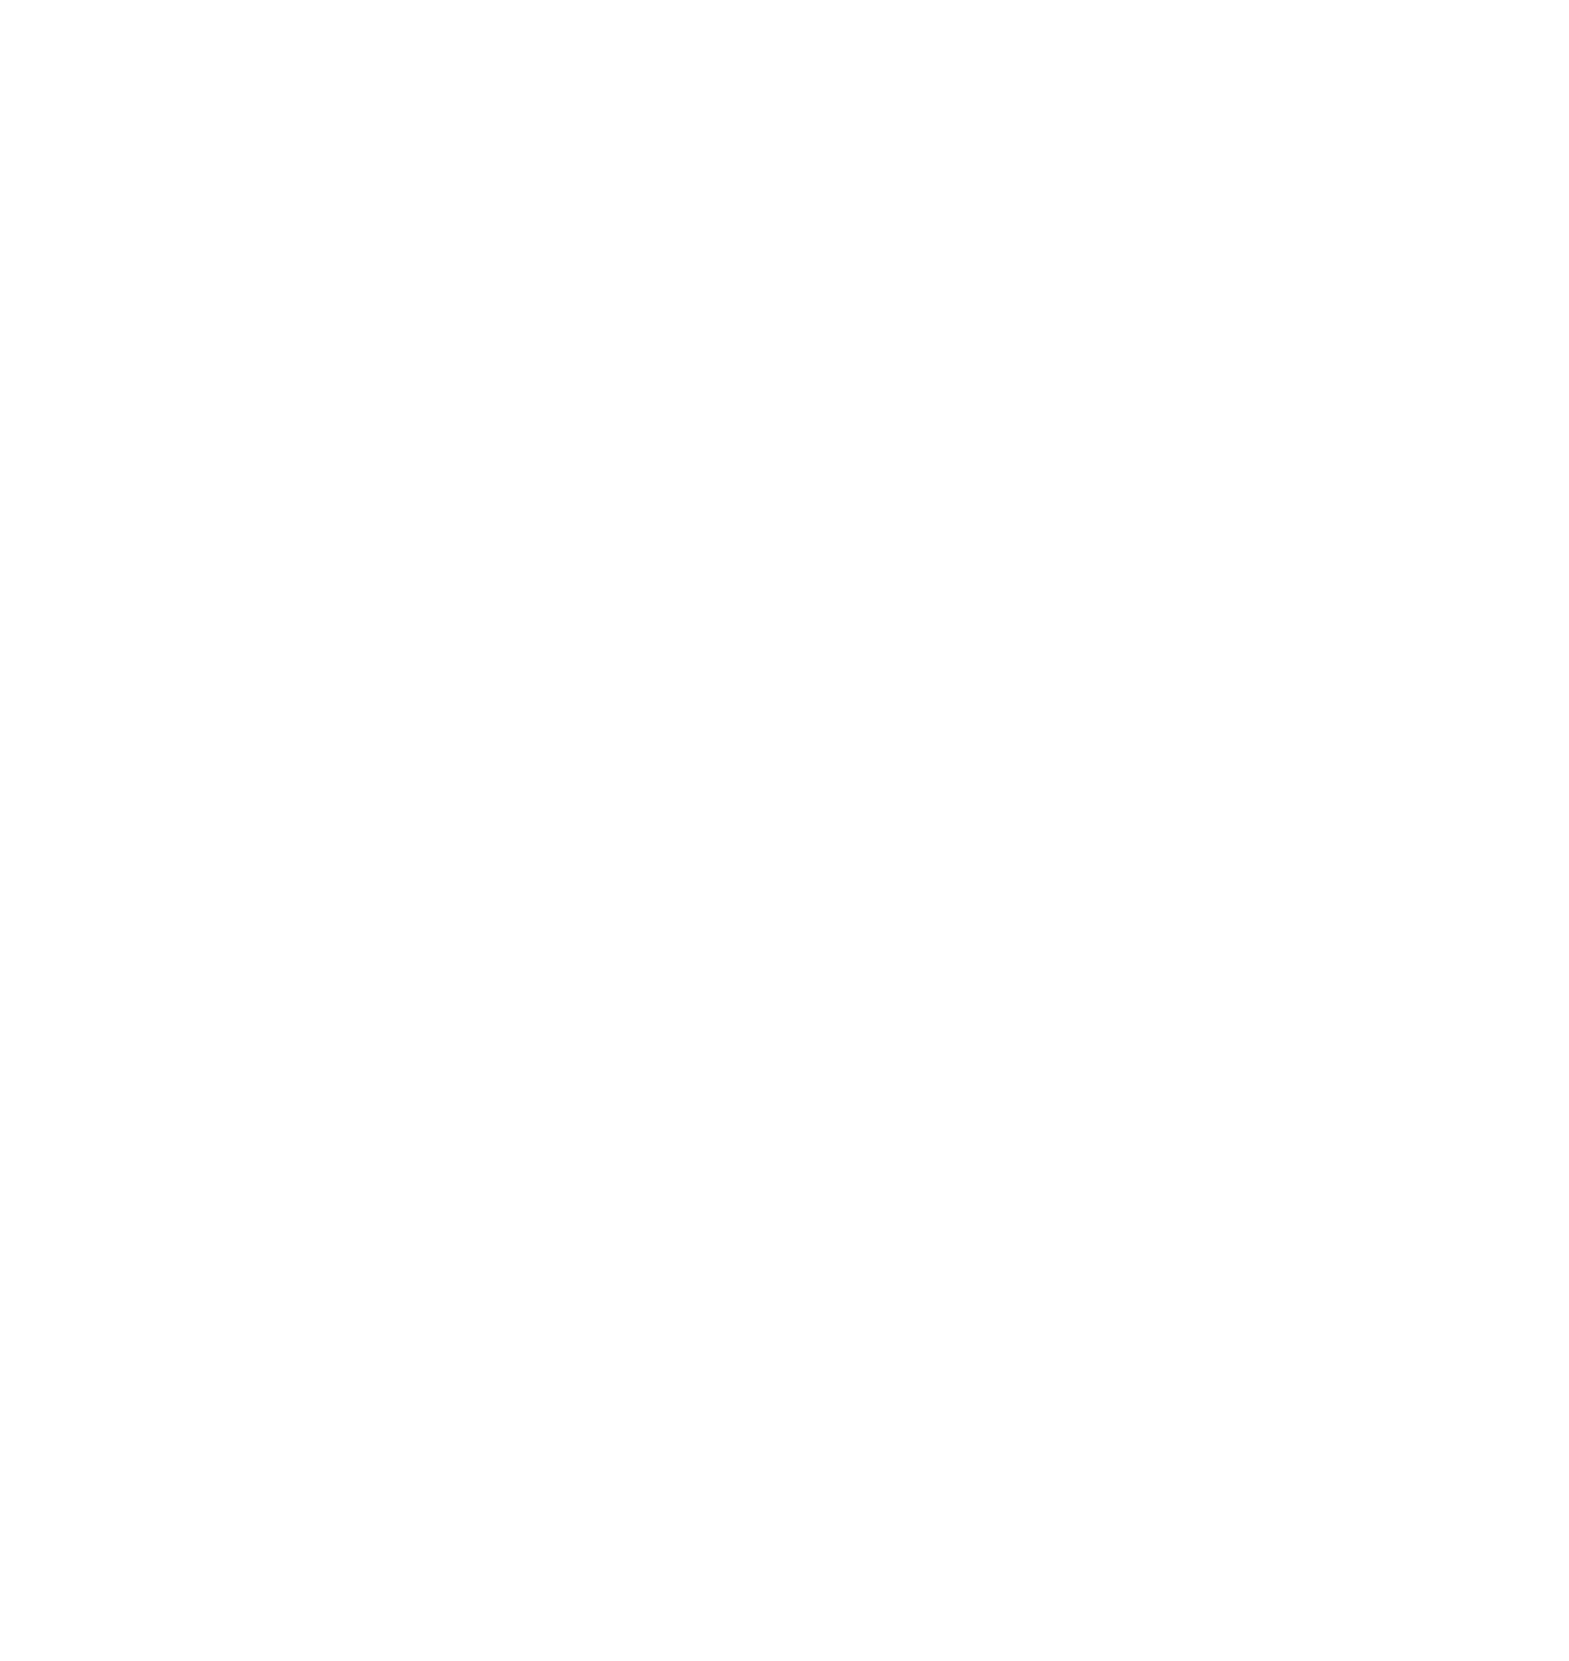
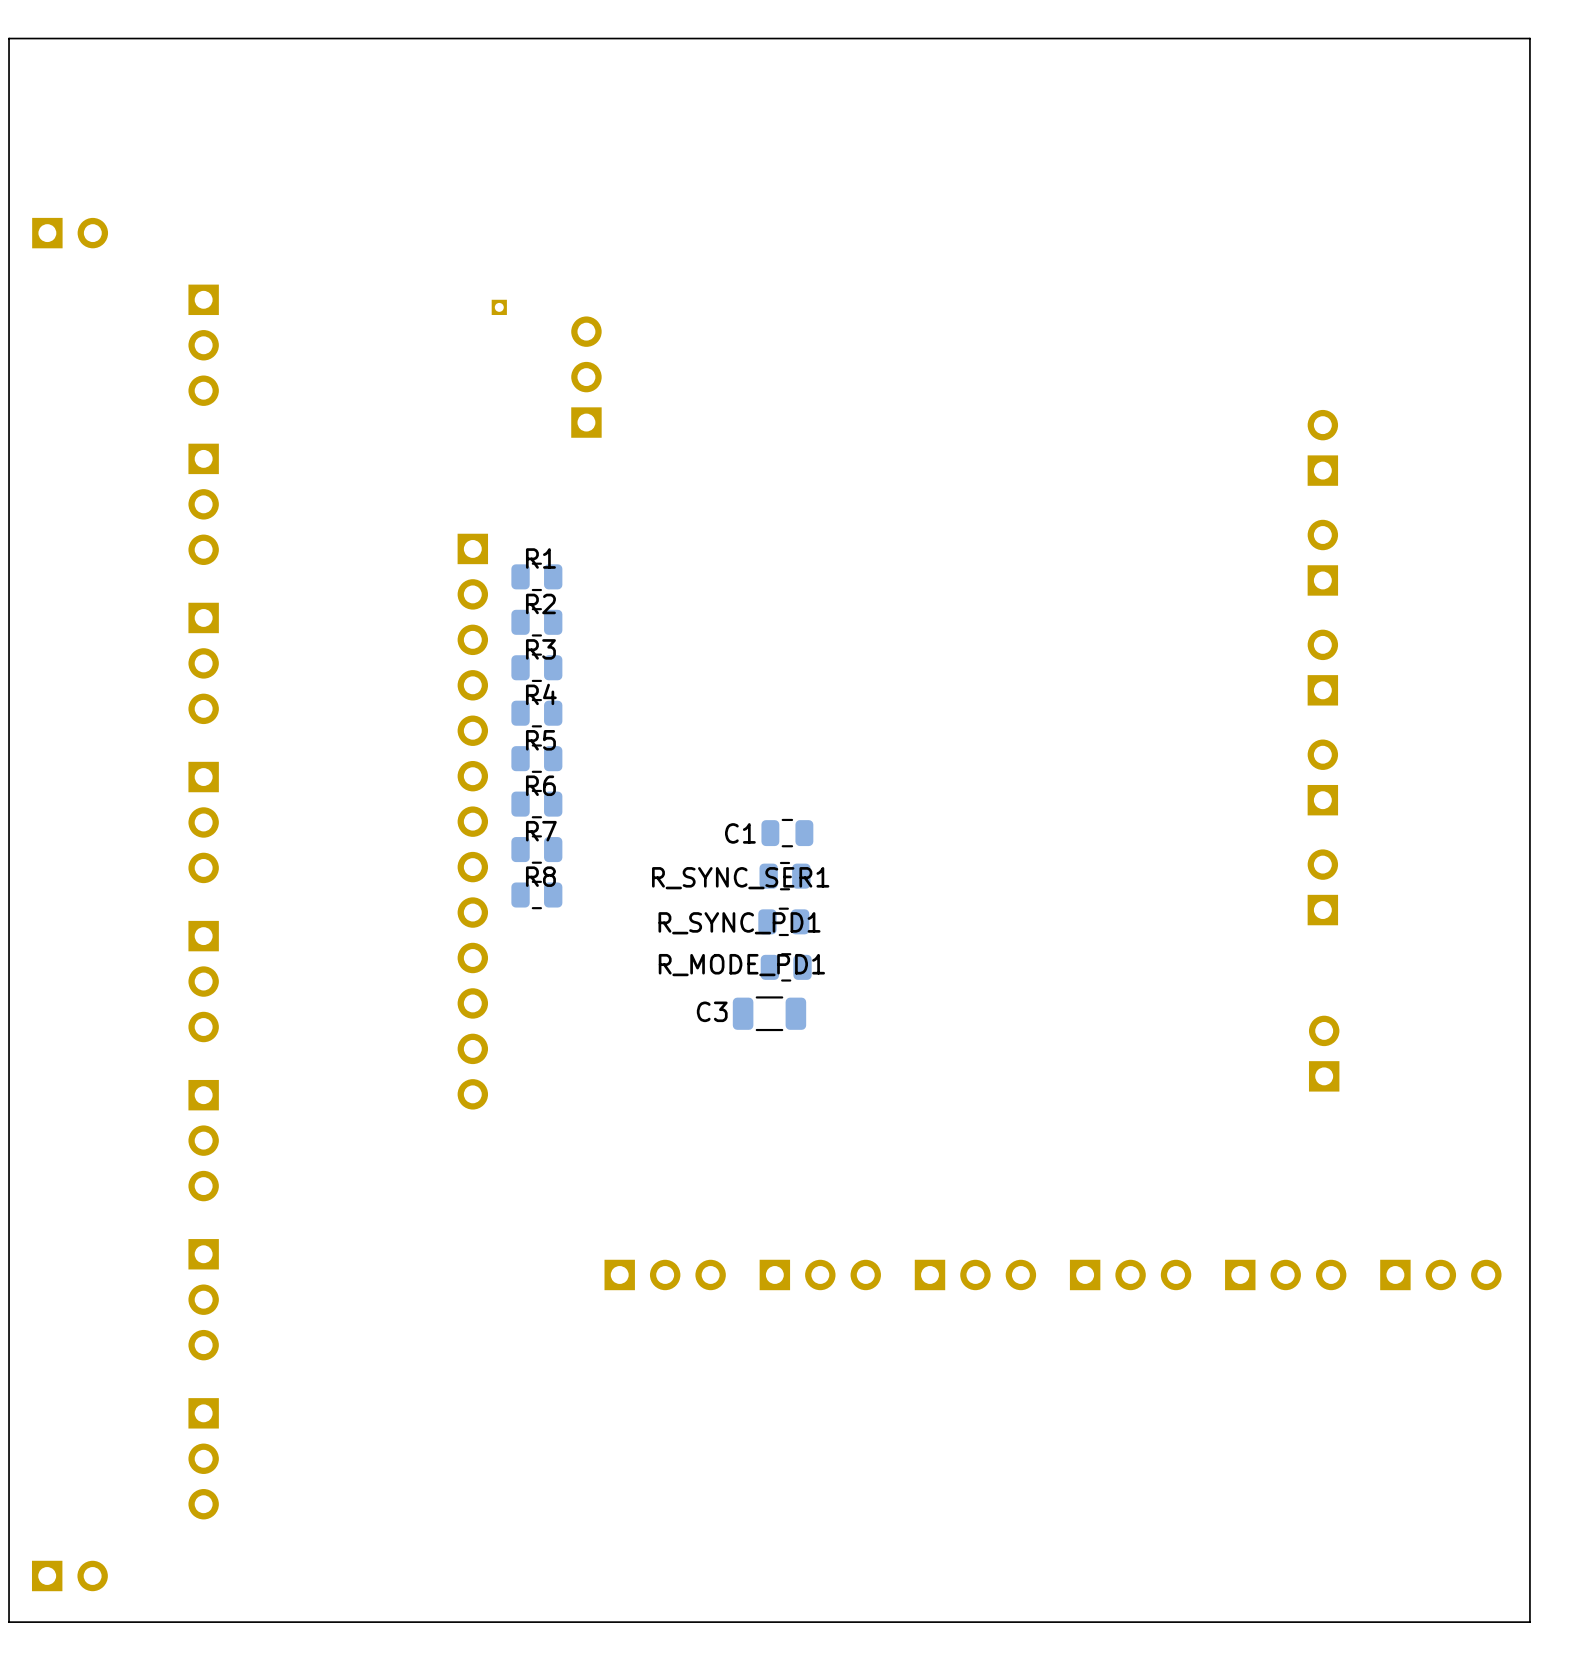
board edge: none -> (1529, 38) (9, 38) (9, 1622) (1529, 1622) (1529, 38)
part: none -> (70, 233)
part: none -> (499, 307)
part: none -> (203, 345)
part: none -> (586, 377)
part: none -> (1322, 447)
part: none -> (203, 504)
part: none -> (1322, 557)
R1: none -> (536, 576)
R2: none -> (536, 622)
part: none -> (203, 663)
R3: none -> (536, 667)
part: none -> (1322, 667)
R4: none -> (536, 713)
R5: none -> (536, 758)
part: none -> (1322, 777)
R6: none -> (536, 804)
part: none -> (472, 821)
part: none -> (203, 822)
C1: none -> (787, 833)
R7: none -> (536, 849)
R_SYNC_SER1: none -> (784, 876)
part: none -> (1322, 887)
R8: none -> (536, 895)
R_SYNC_PD1: none -> (783, 921)
R_MODE_PD1: none -> (786, 967)
part: none -> (203, 981)
C3: none -> (769, 1013)
part: none -> (1324, 1053)
part: none -> (203, 1140)
part: none -> (665, 1274)
part: none -> (820, 1274)
part: none -> (975, 1274)
part: none -> (1130, 1274)
part: none -> (1285, 1274)
part: none -> (1440, 1274)
part: none -> (203, 1299)
part: none -> (203, 1458)
part: none -> (69, 1575)

